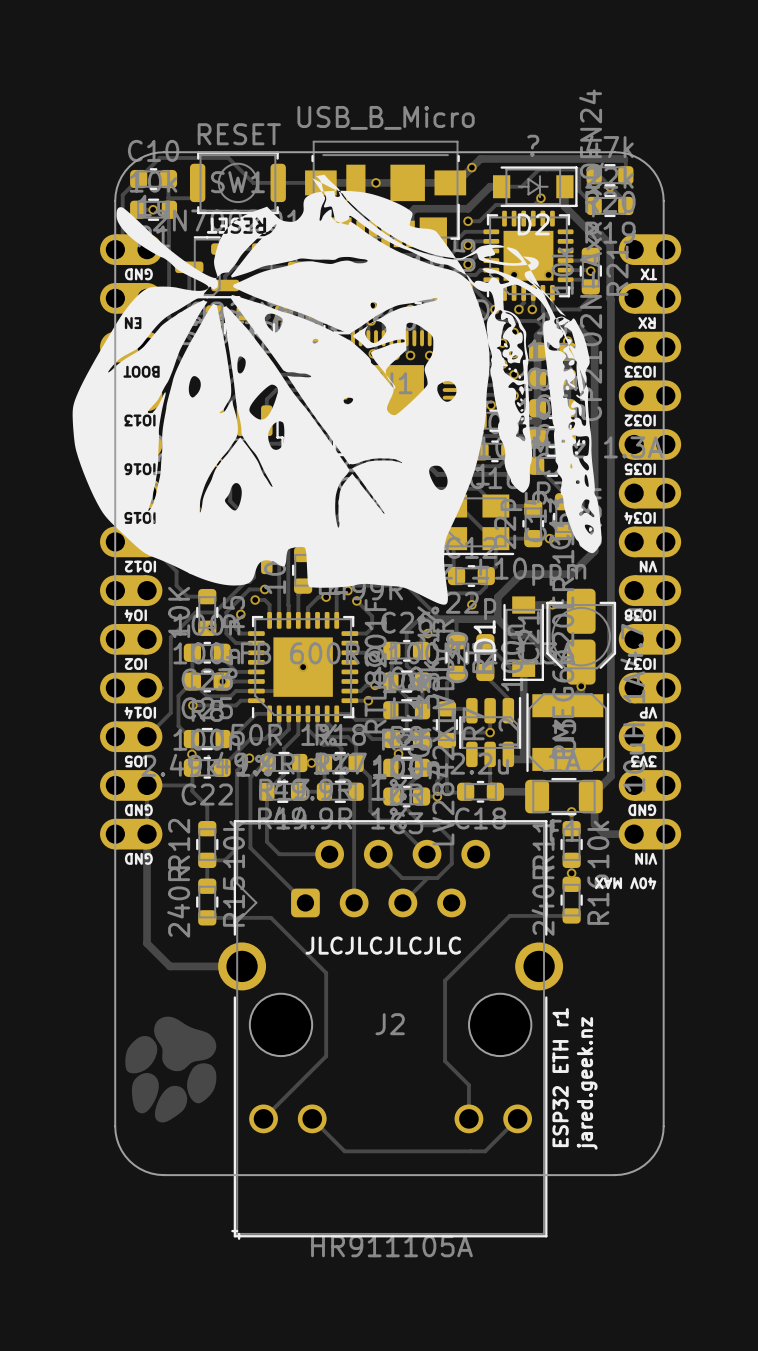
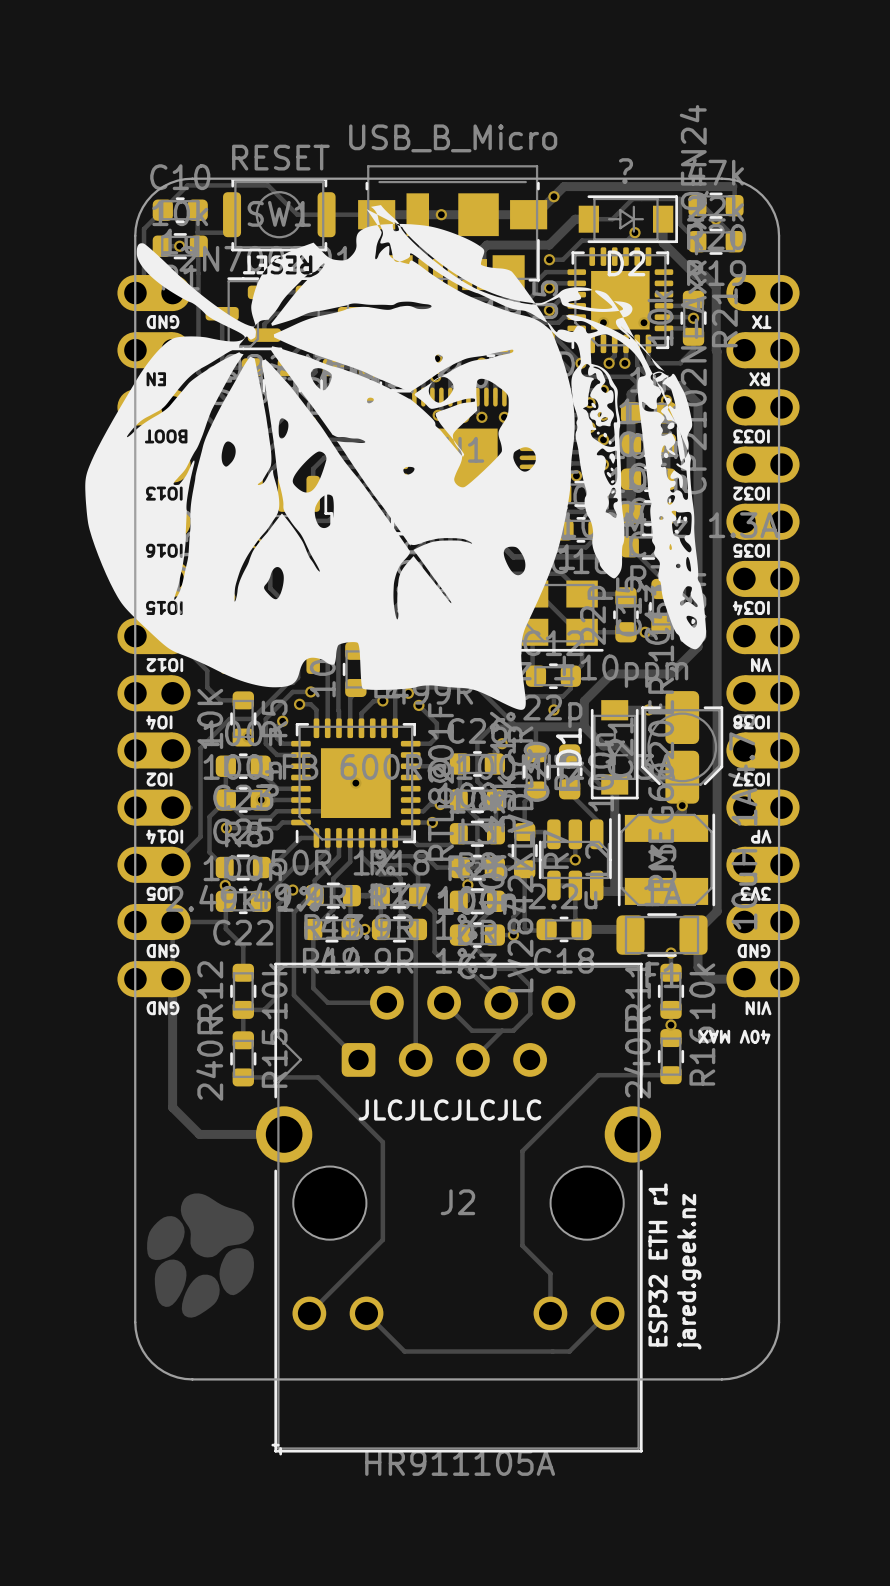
via position: (311, 763) -> (364, 929)

